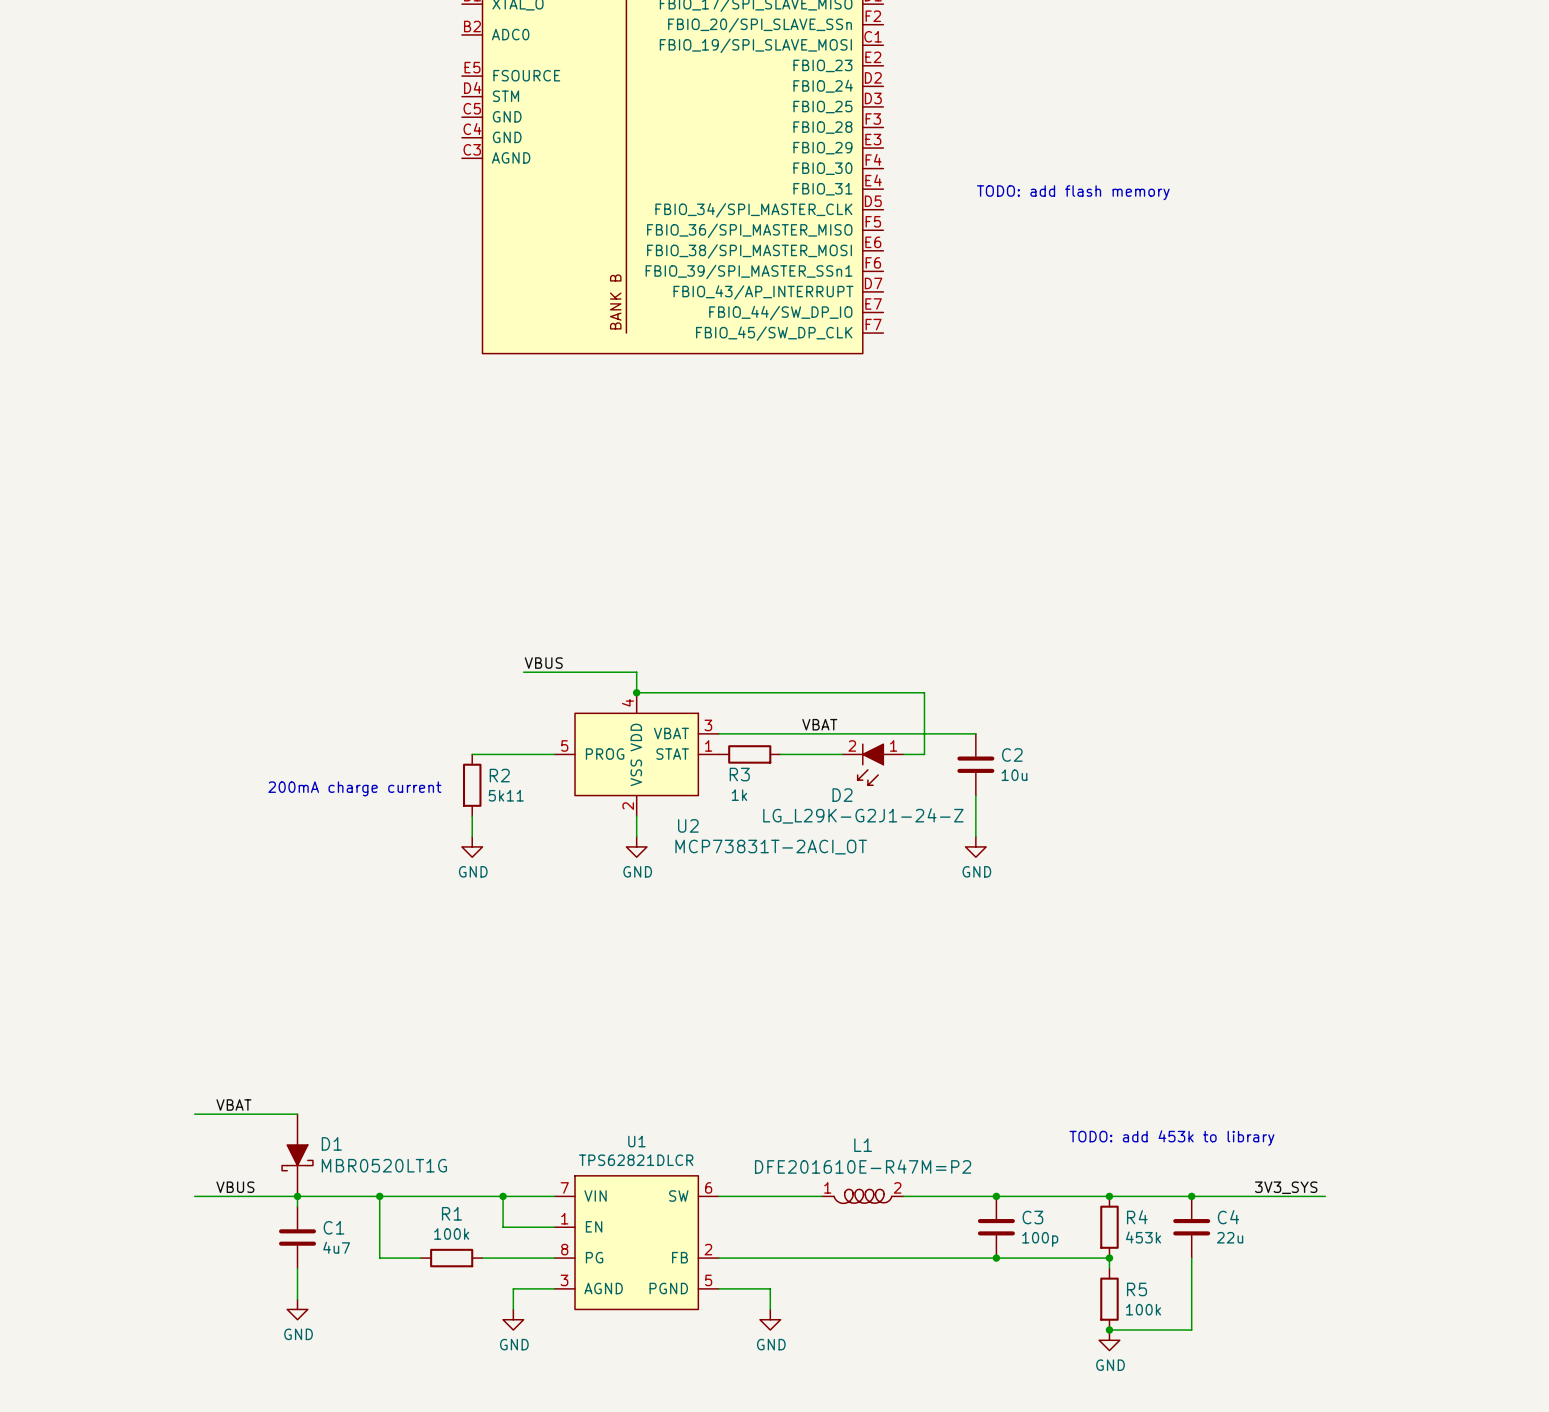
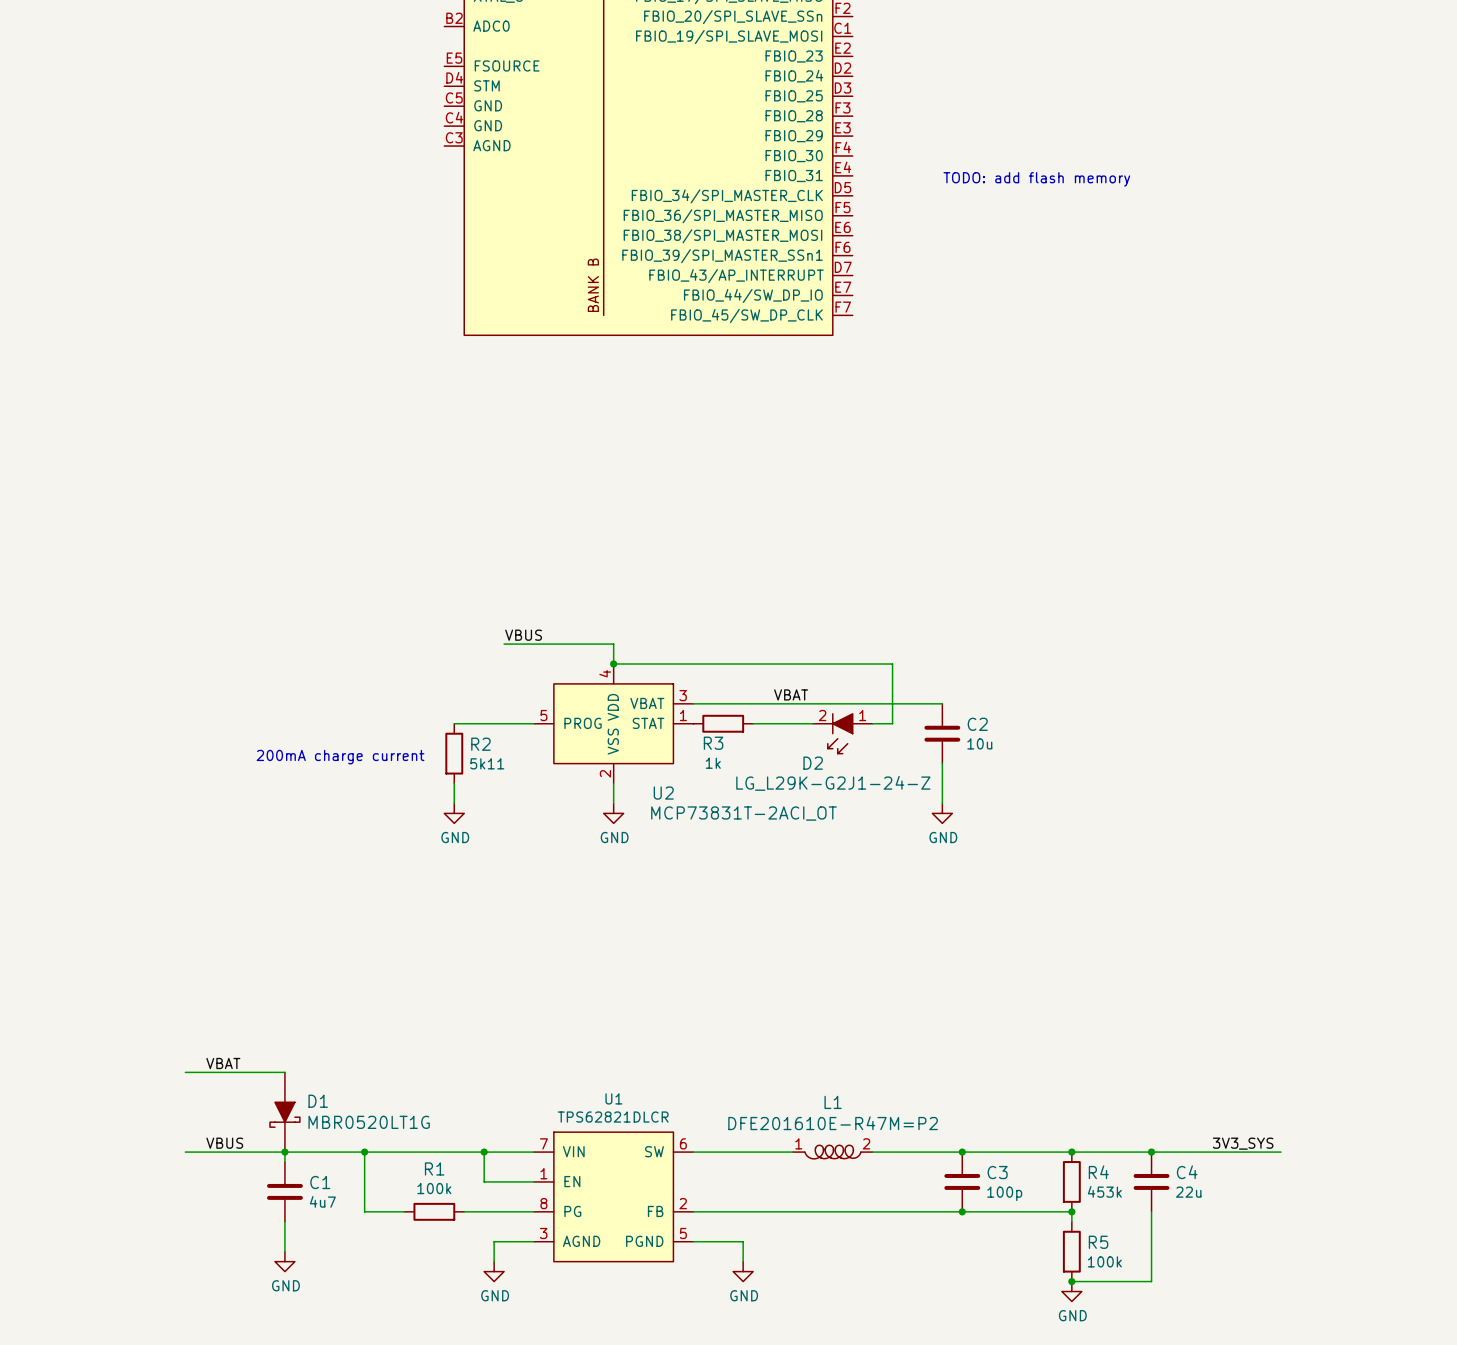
text: TODO: add 453k to library (1171, 1138) -> none

